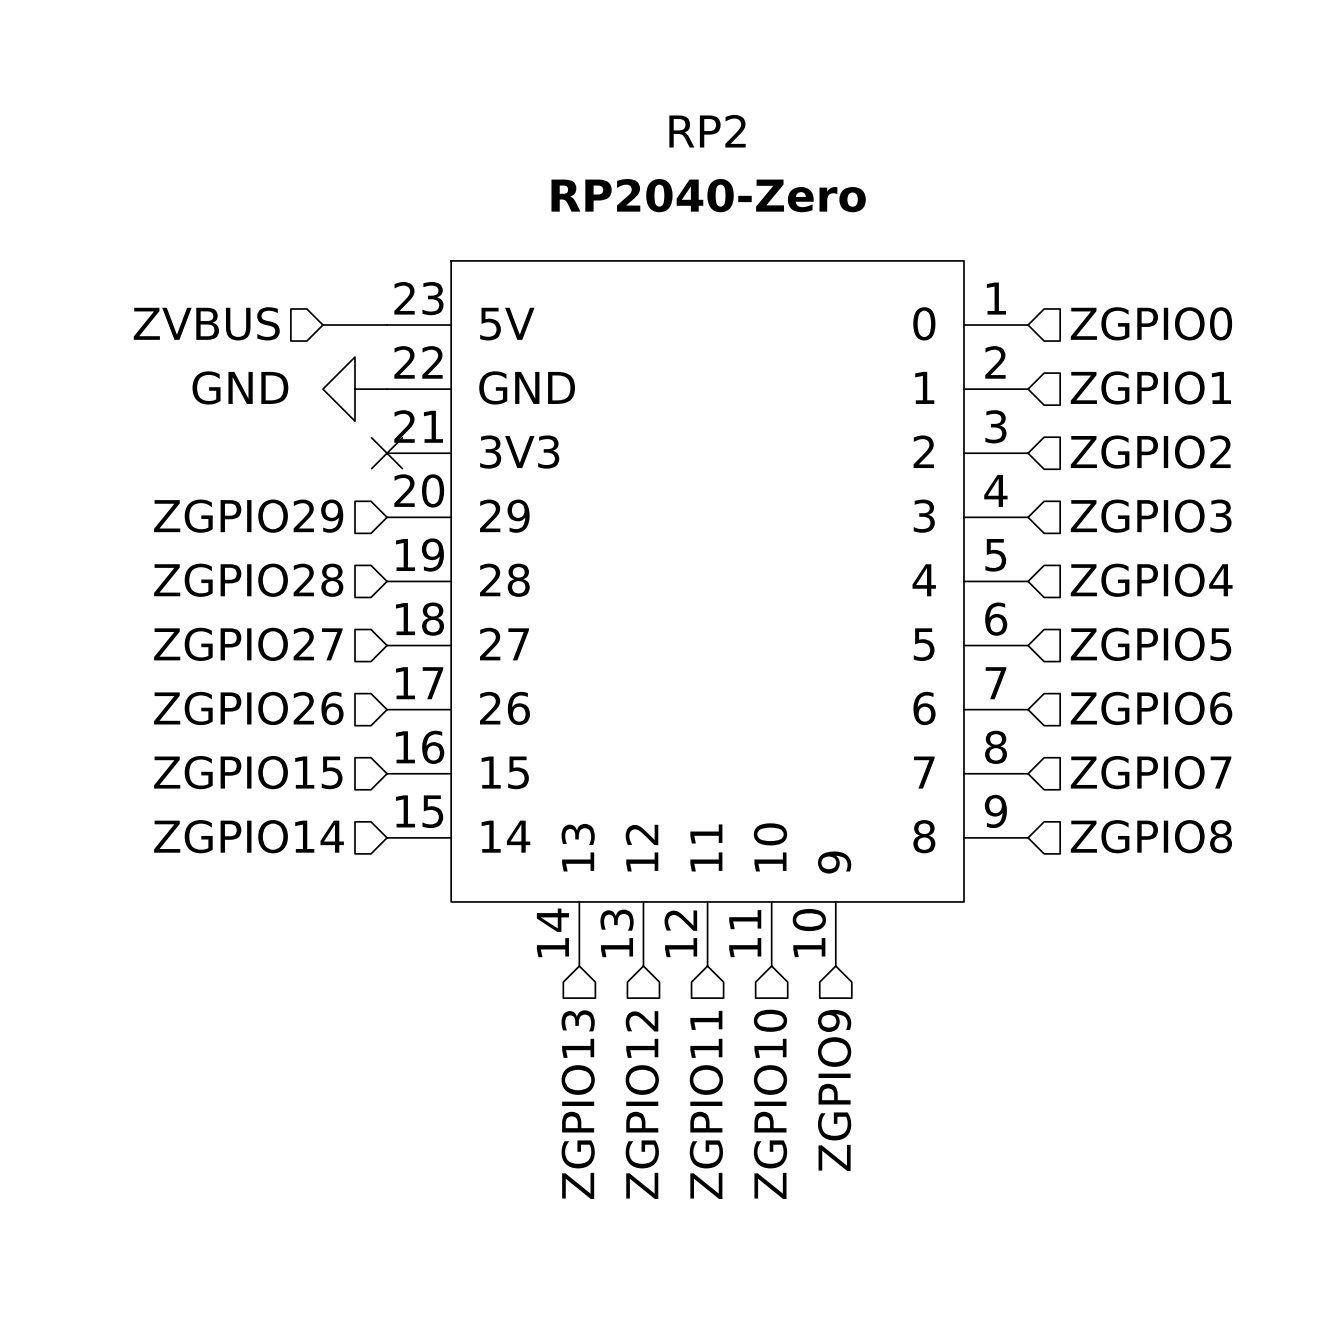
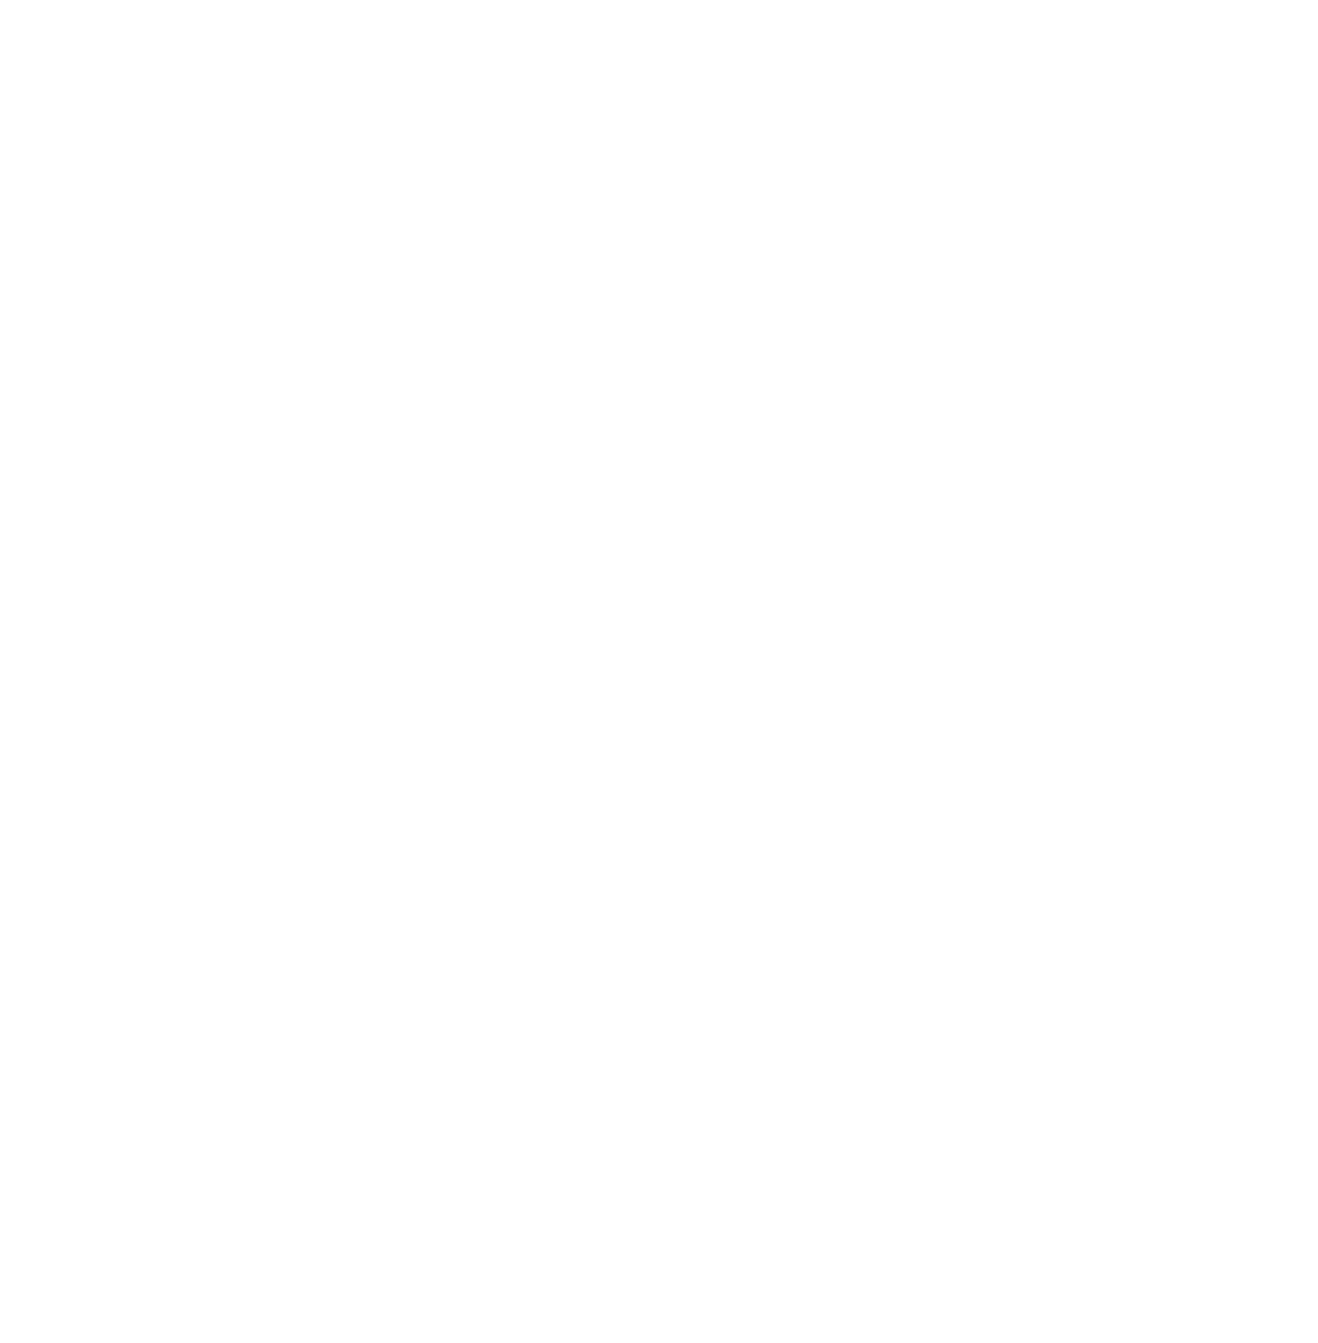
hierarchical label: ZVBUS (206, 323) -> none
hierarchical label: ZGPIO0 (1151, 323) -> none
wire: (322, 325) (387, 325) -> none
hierarchical label: ZGPIO1 (1150, 387) -> none
power symbol: GND (354, 389) -> none
hierarchical label: ZGPIO2 (1150, 452) -> none
no-connect mark: (387, 453) -> none
hierarchical label: ZGPIO29 (248, 516) -> none
hierarchical label: ZGPIO3 (1151, 516) -> none
hierarchical label: ZGPIO28 (248, 580) -> none
hierarchical label: ZGPIO4 (1151, 580) -> none
RP2: RP2040-Zero (707, 613) -> none
hierarchical label: ZGPIO27 (248, 644) -> none
hierarchical label: ZGPIO5 (1150, 644) -> none
hierarchical label: ZGPIO26 (248, 708) -> none
hierarchical label: ZGPIO6 (1151, 708) -> none
hierarchical label: ZGPIO15 (248, 772) -> none
hierarchical label: ZGPIO7 (1151, 772) -> none
hierarchical label: ZGPIO14 (248, 836) -> none
hierarchical label: ZGPIO8 (1151, 836) -> none
hierarchical label: ZGPIO9 (834, 1090) -> none
hierarchical label: ZGPIO13 (578, 1104) -> none
hierarchical label: ZGPIO11 (706, 1104) -> none
hierarchical label: ZGPIO10 (770, 1104) -> none
hierarchical label: ZGPIO12 (642, 1105) -> none

